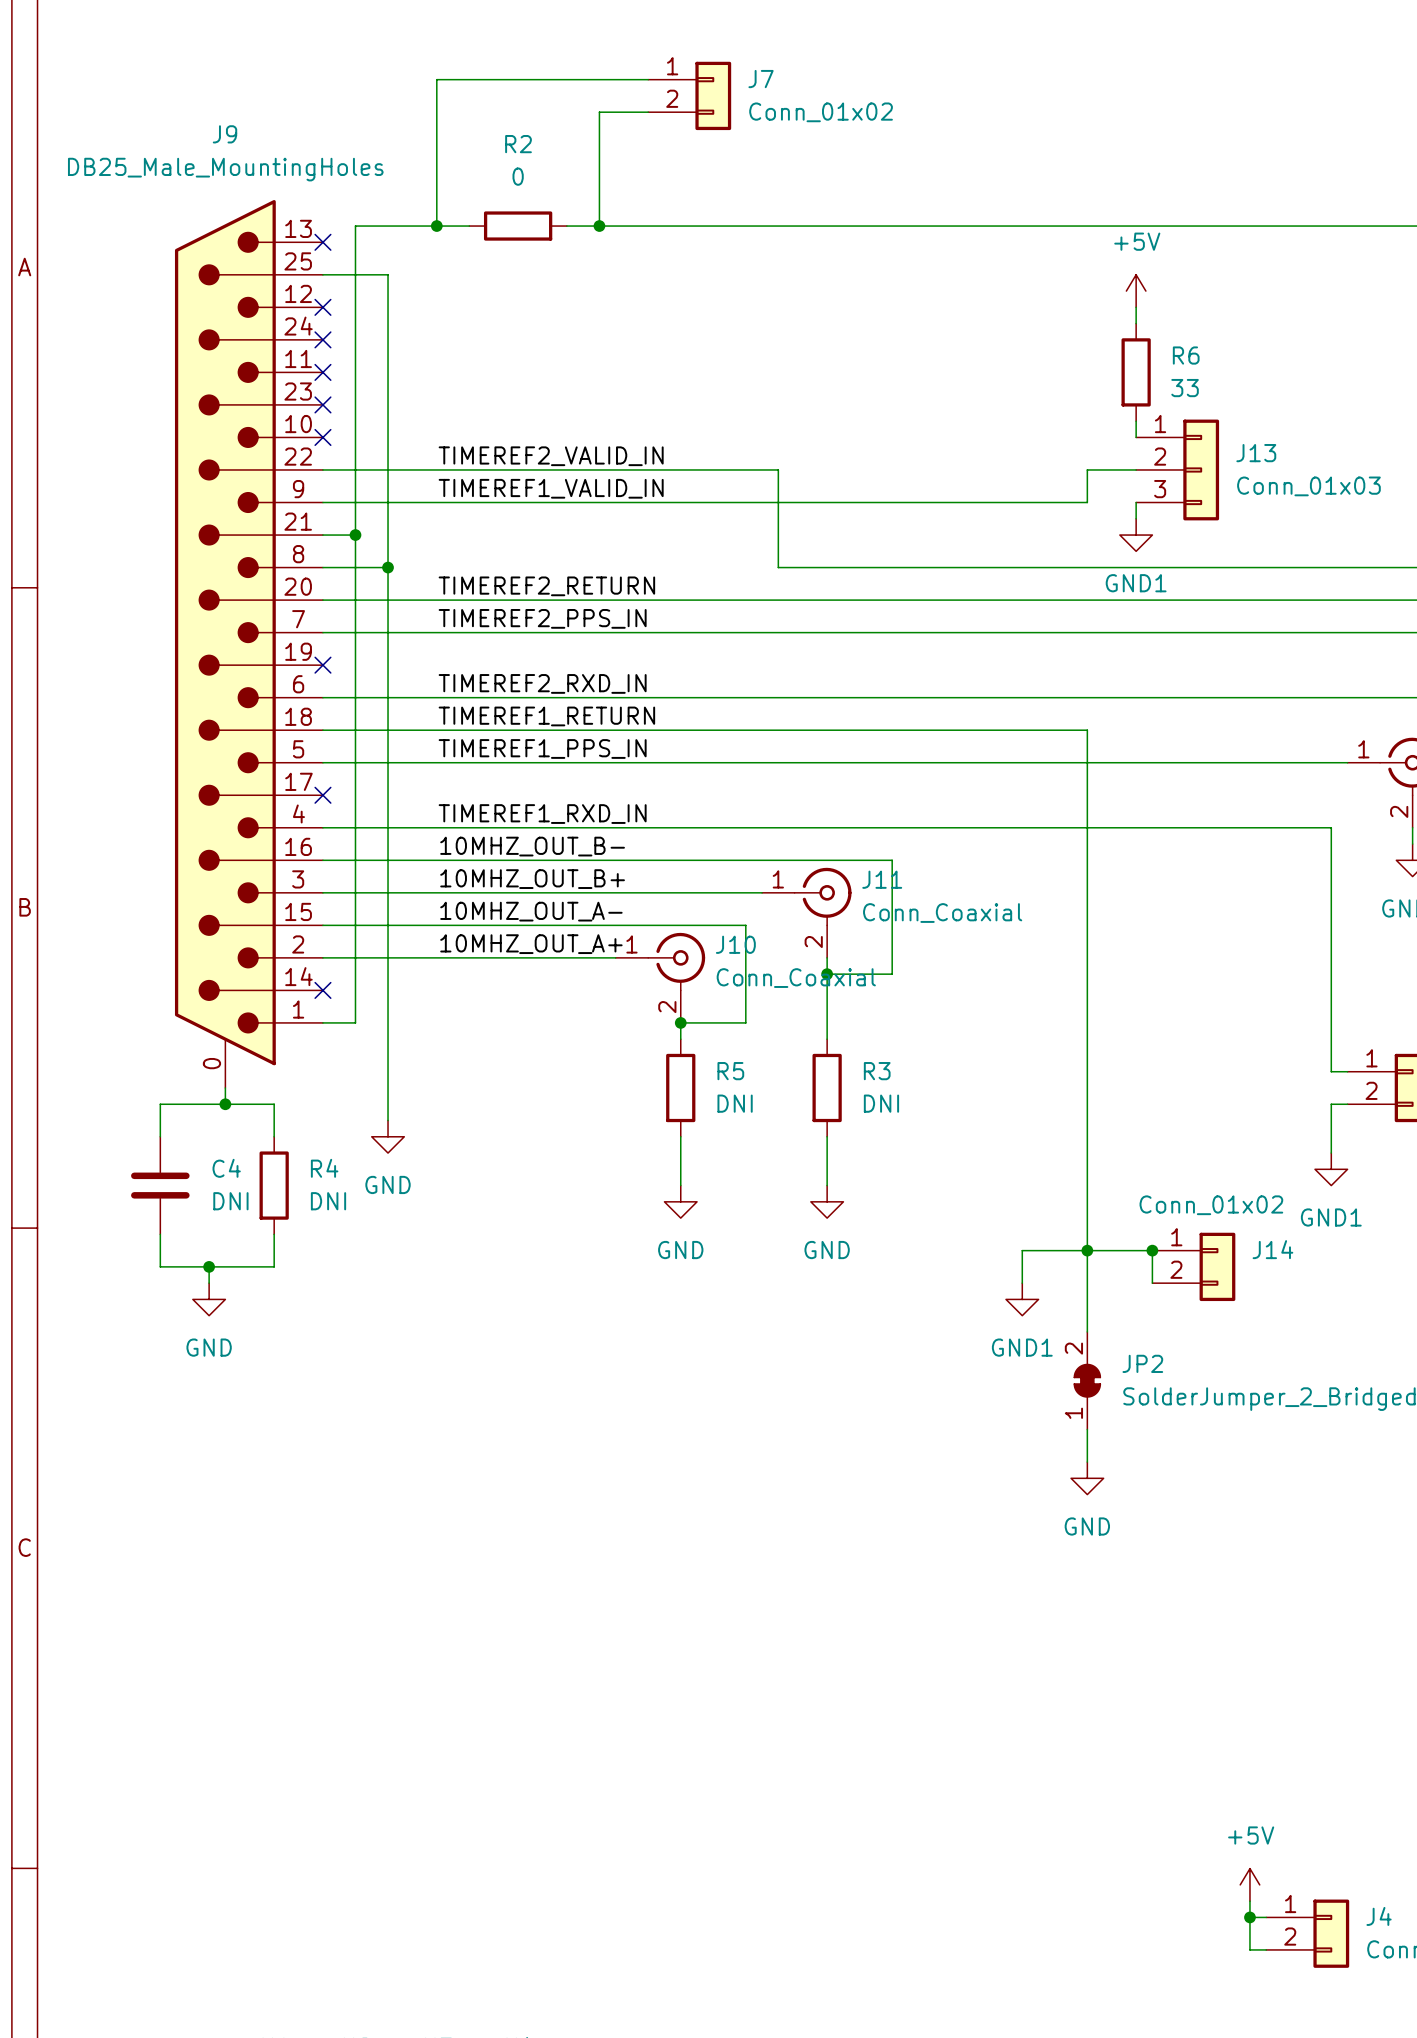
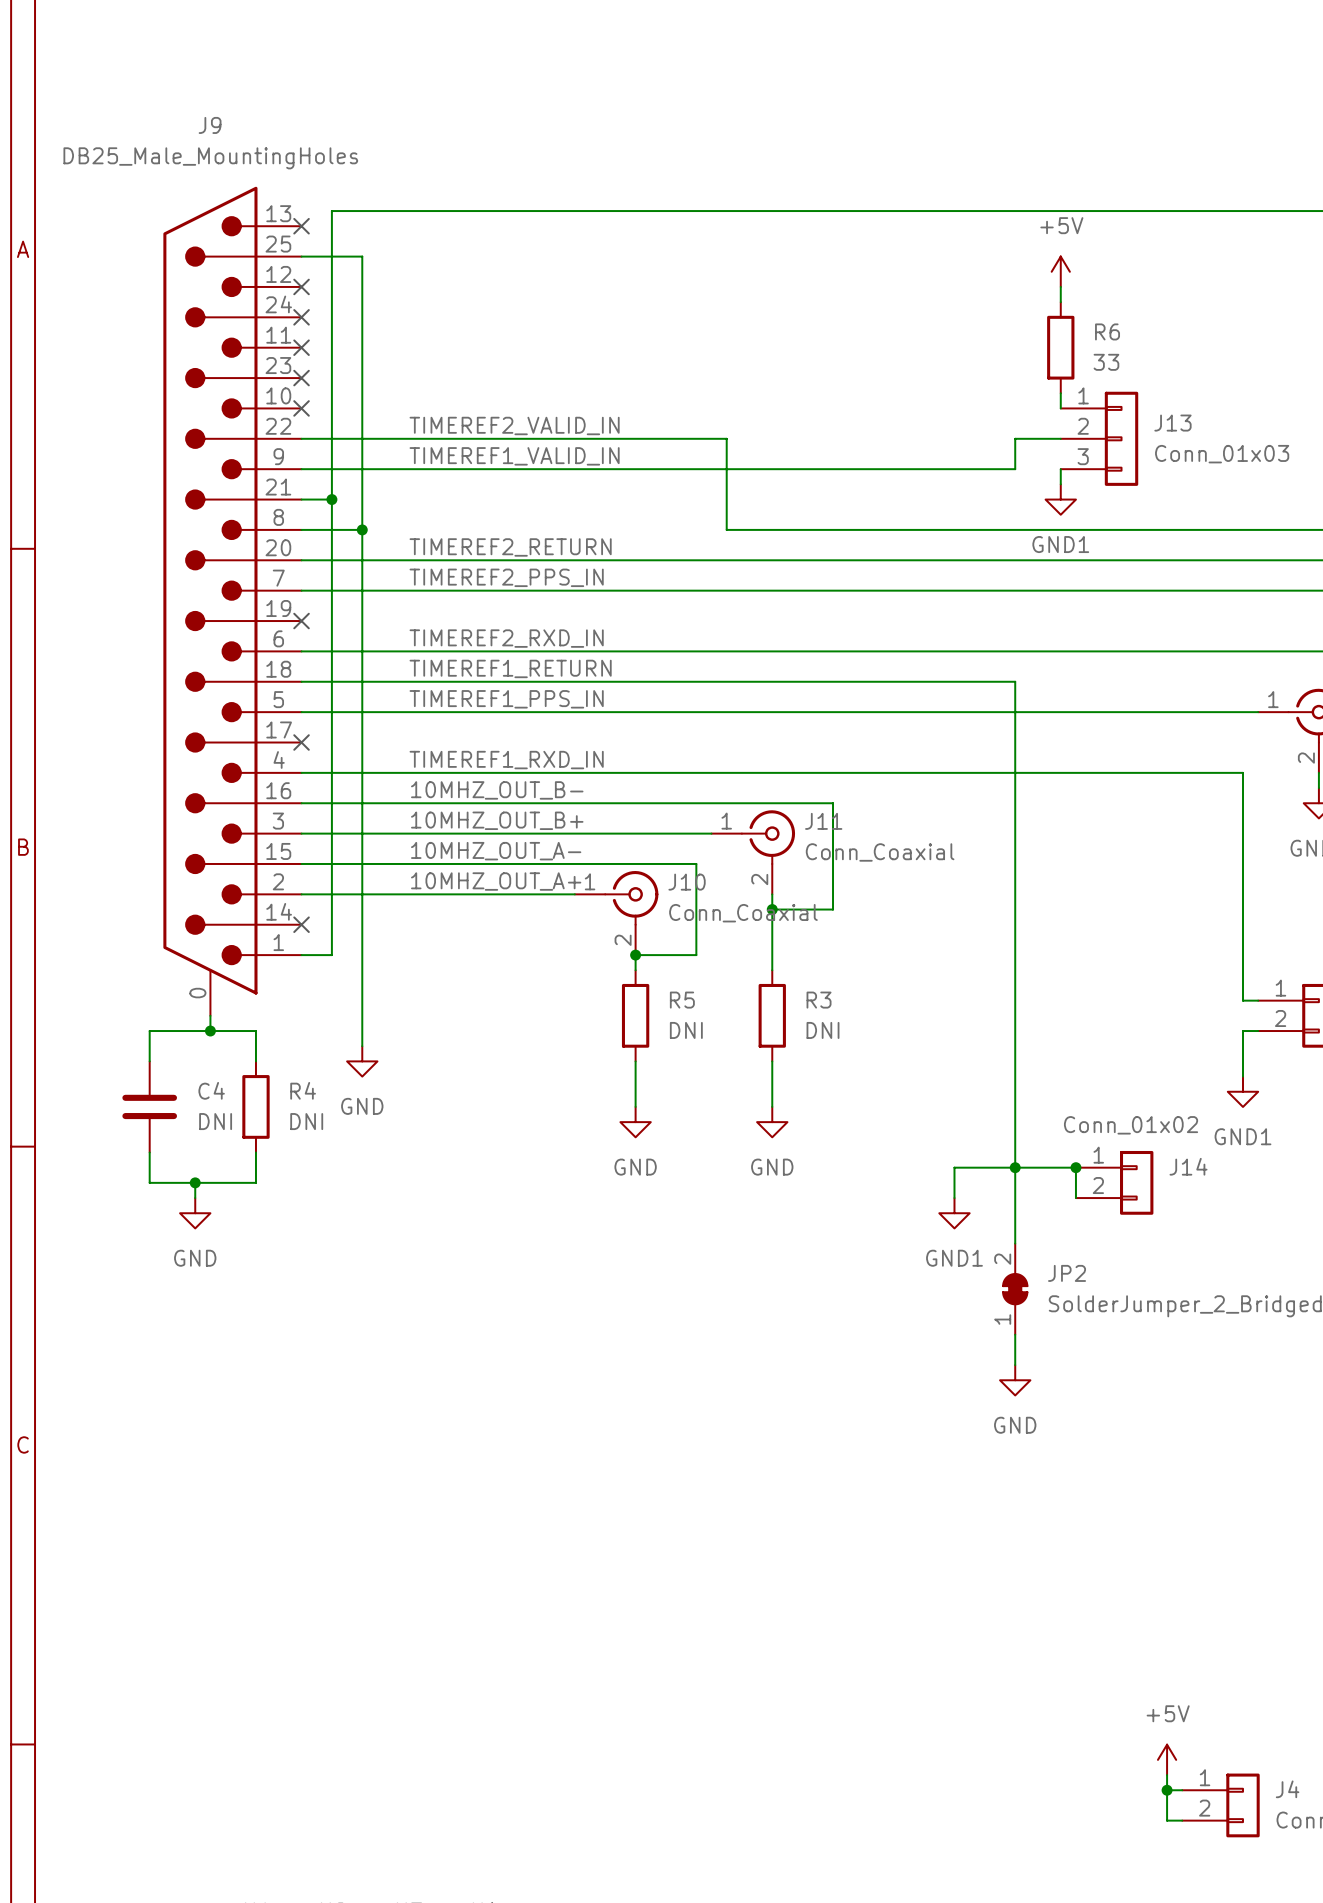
wire: (648, 79) (436, 79) (436, 226) -> none
J7: Conn_01x02 (689, 95) -> none
wire: (648, 112) (599, 112) (599, 226) -> none
junction: (436, 226) -> none
wire: none -> (438, 211) (529, 211)
R2: 0 (518, 226) -> none
junction: (599, 226) -> none

